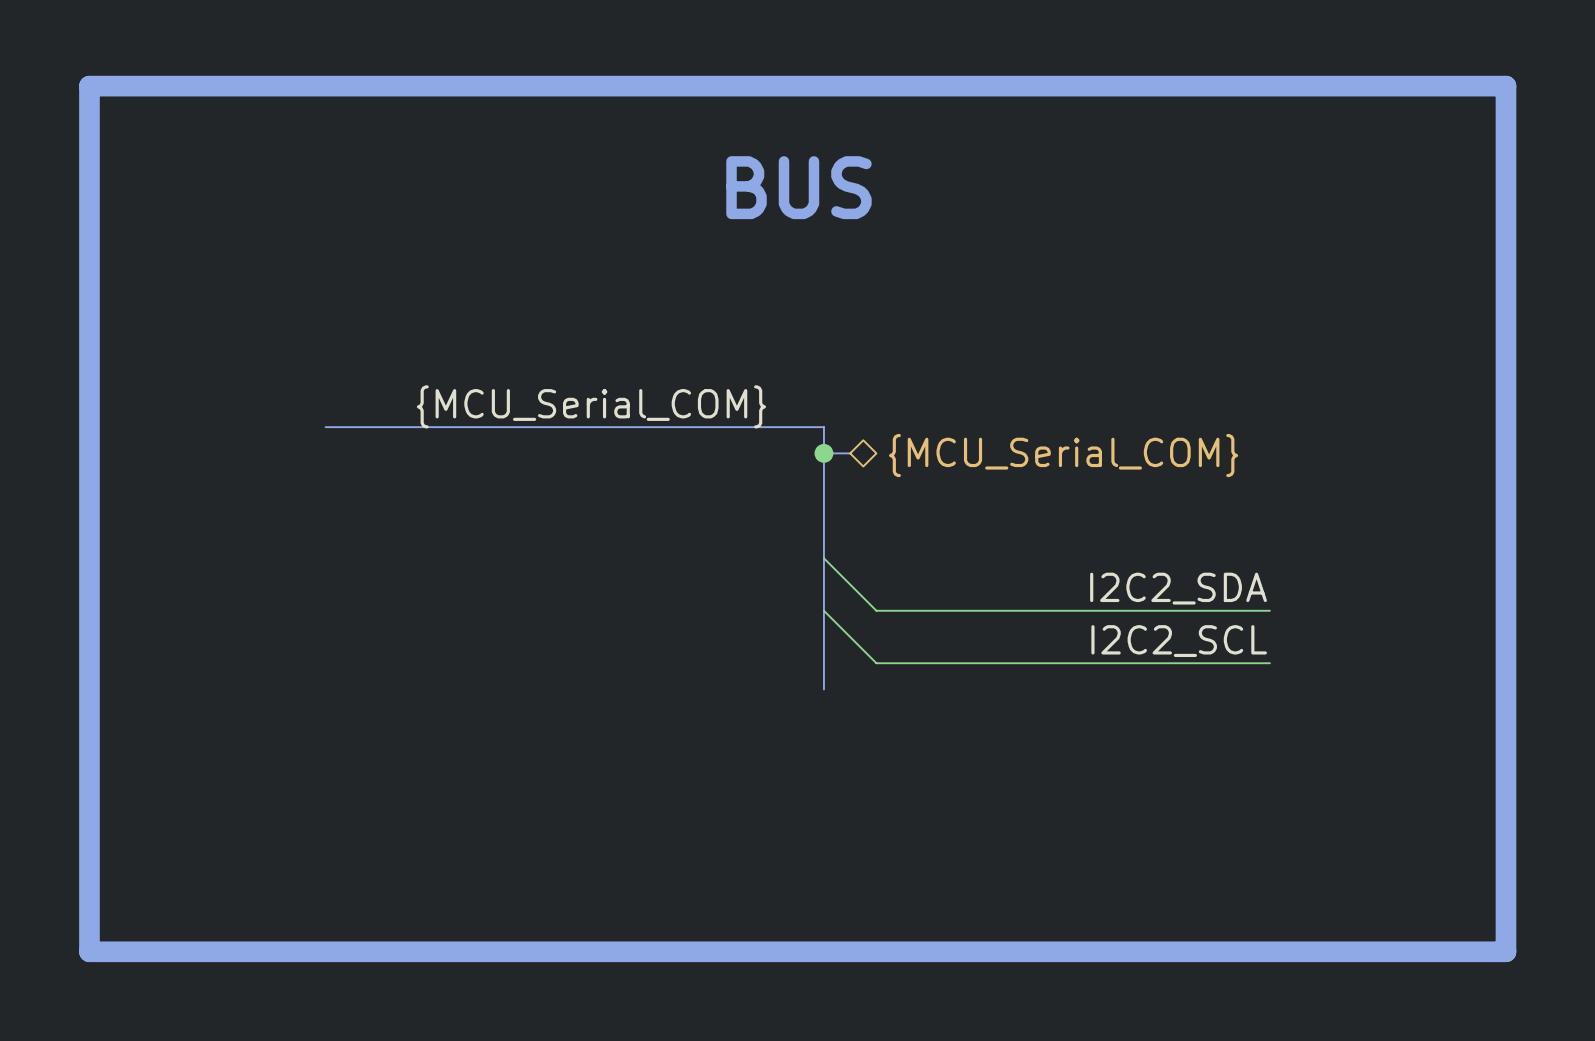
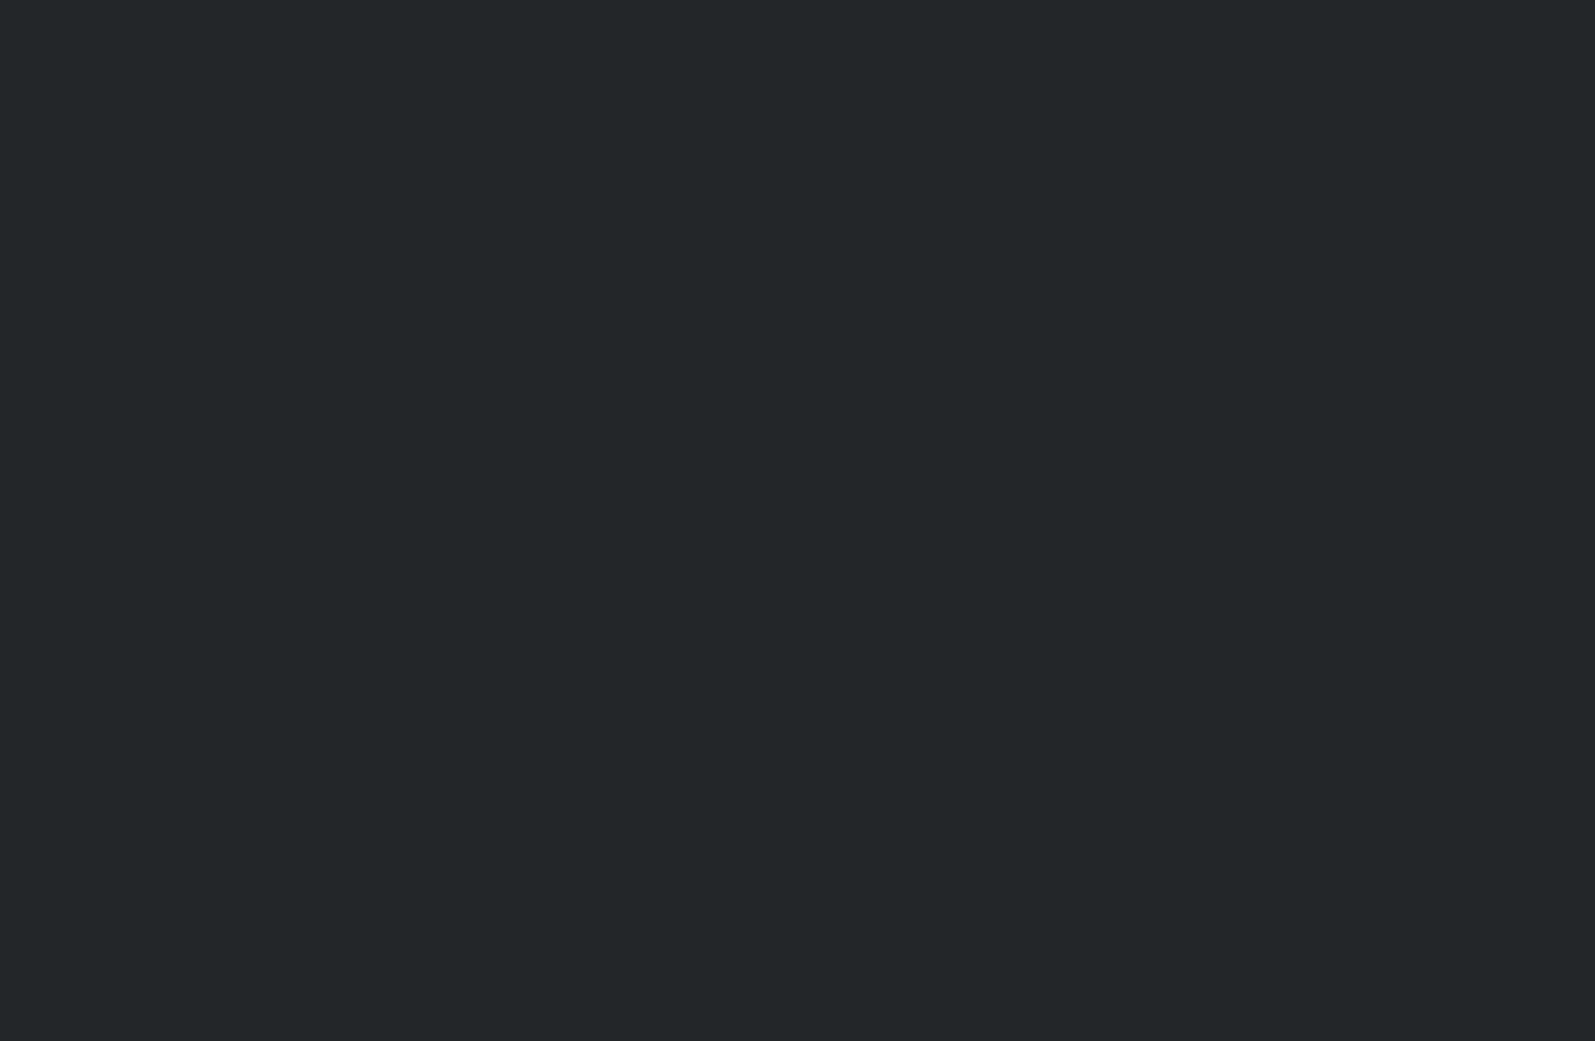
line: (89, 86) (1505, 86) (1505, 951) (89, 951) (89, 86) -> none
text: BUS (798, 187) -> none
label: {MCU_Serial_COM} (591, 406) -> none
bus: (325, 427) (823, 427) (823, 689) -> none
bus: (823, 453) (850, 453) -> none
junction: (823, 453) -> none
hierarchical label: {MCU_Serial_COM} (1063, 455) -> none
wire: (823, 558) (876, 610) (1269, 610) -> none
label: I2C2_SDA (1178, 588) -> none
wire: (823, 610) (876, 663) (1269, 663) -> none
label: I2C2_SCL (1179, 641) -> none

